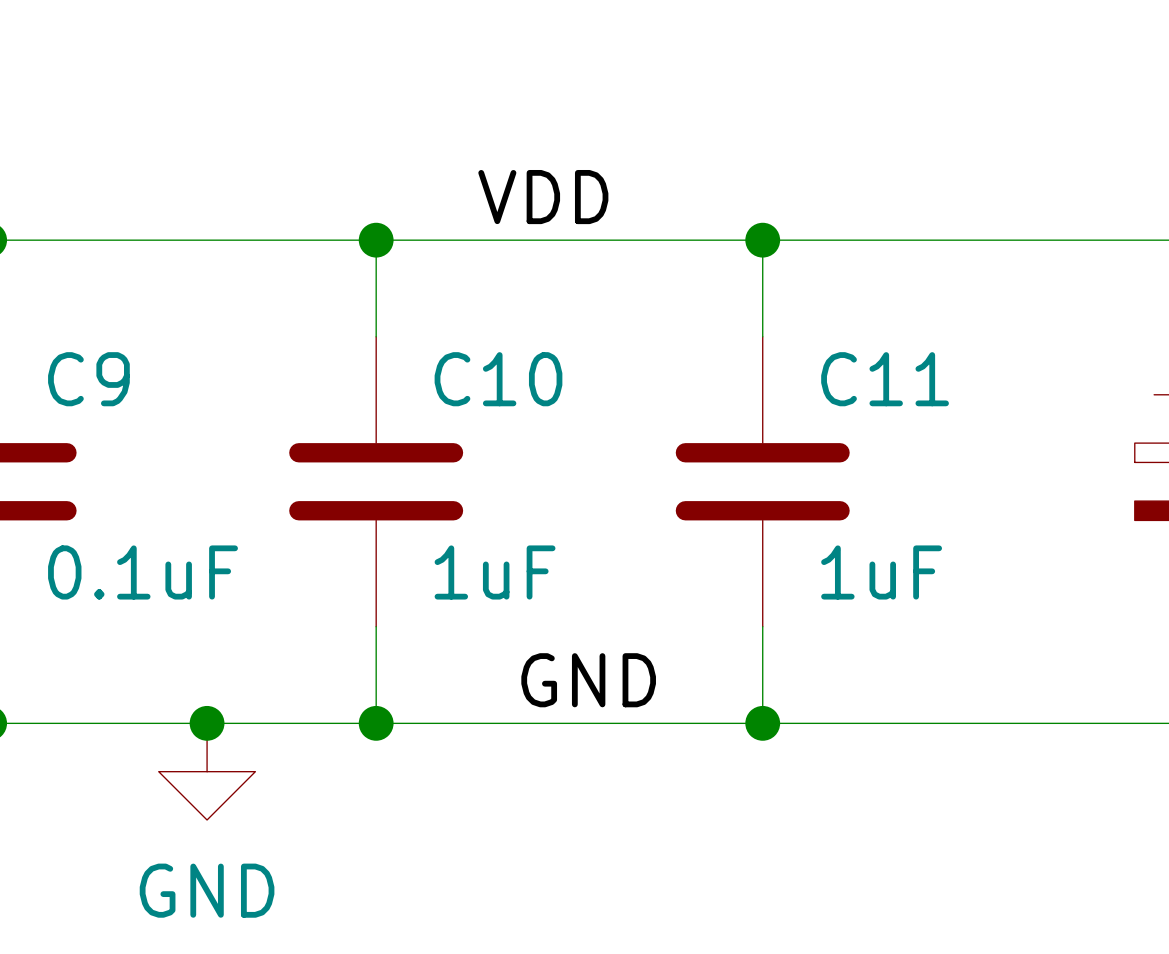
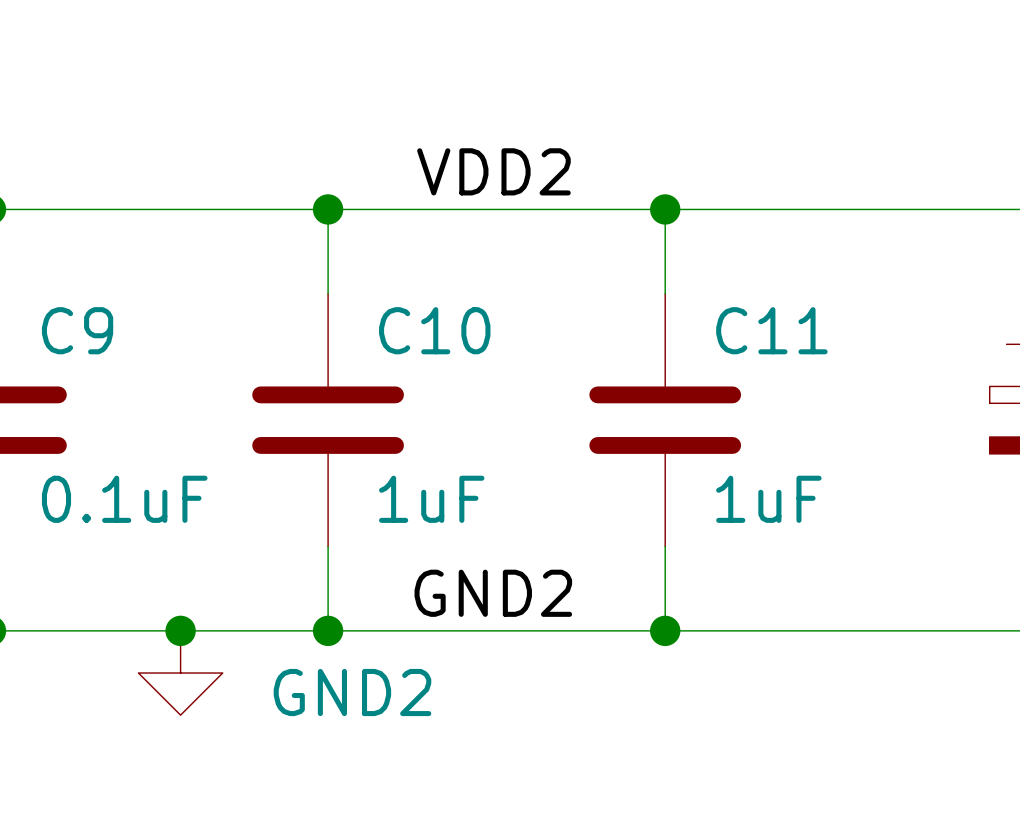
label: VDD (543, 197) -> VDD2 (493, 171)
label: GND (588, 680) -> GND2 (493, 593)
power symbol: GND (207, 771) -> GND2 (180, 673)

